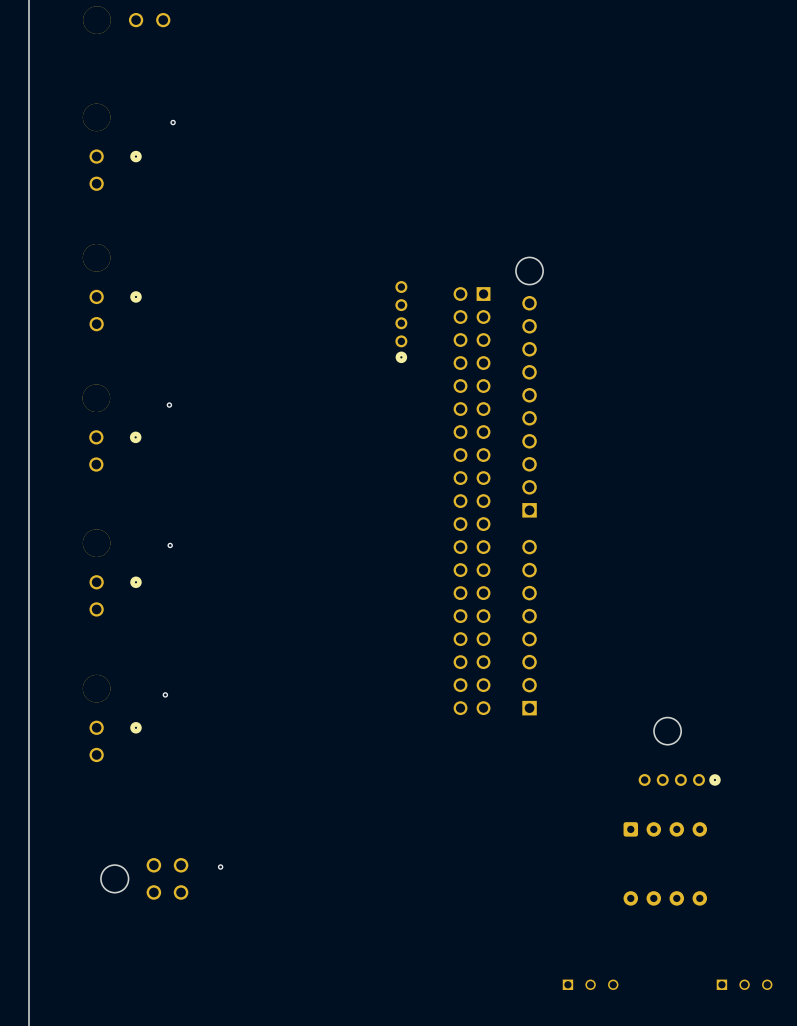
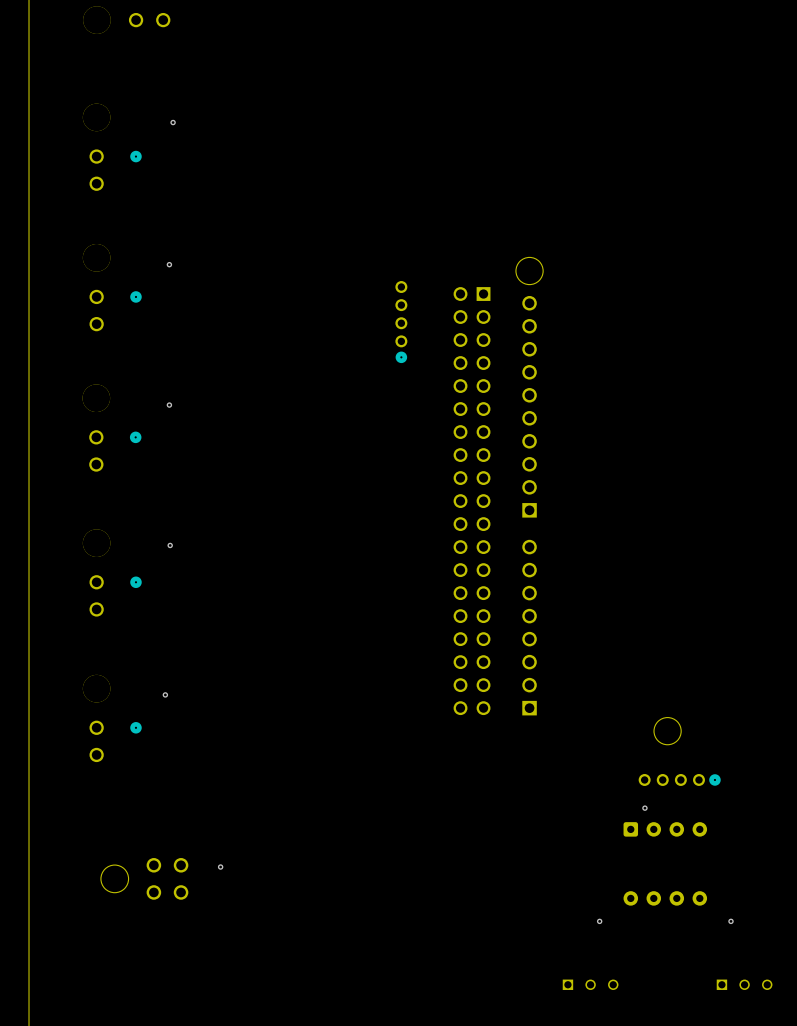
via: none -> (169, 264)
via: none -> (644, 808)
via: none -> (599, 921)
via: none -> (731, 921)

